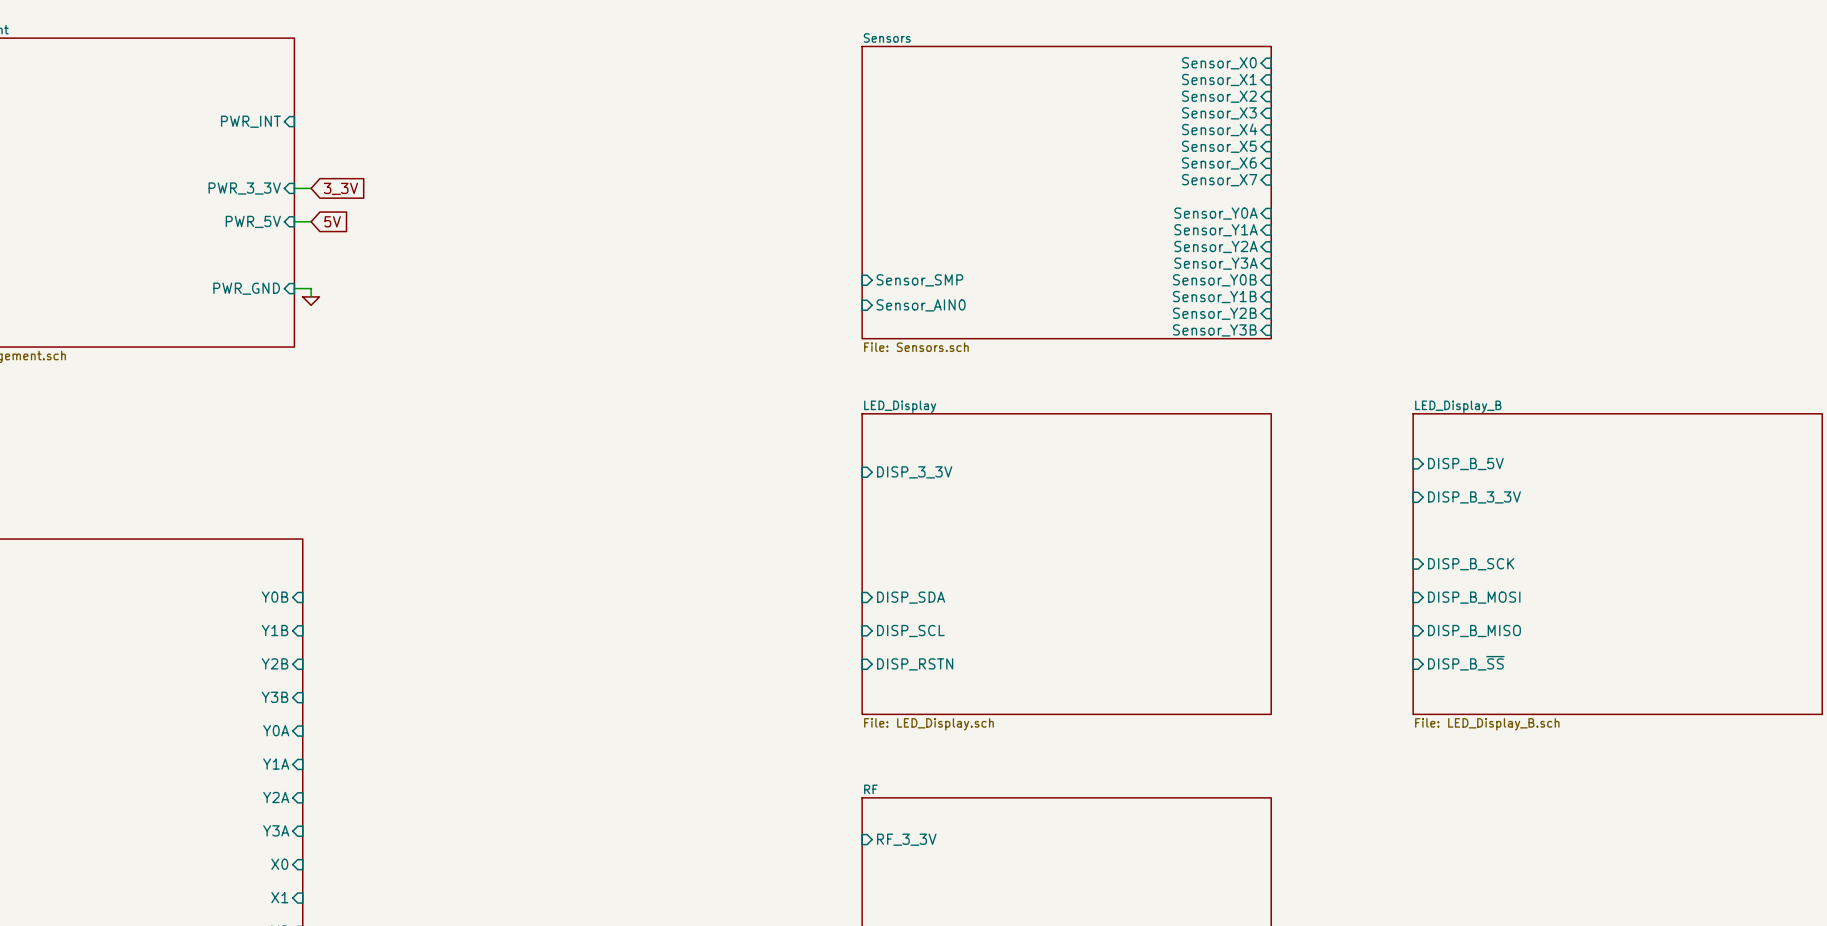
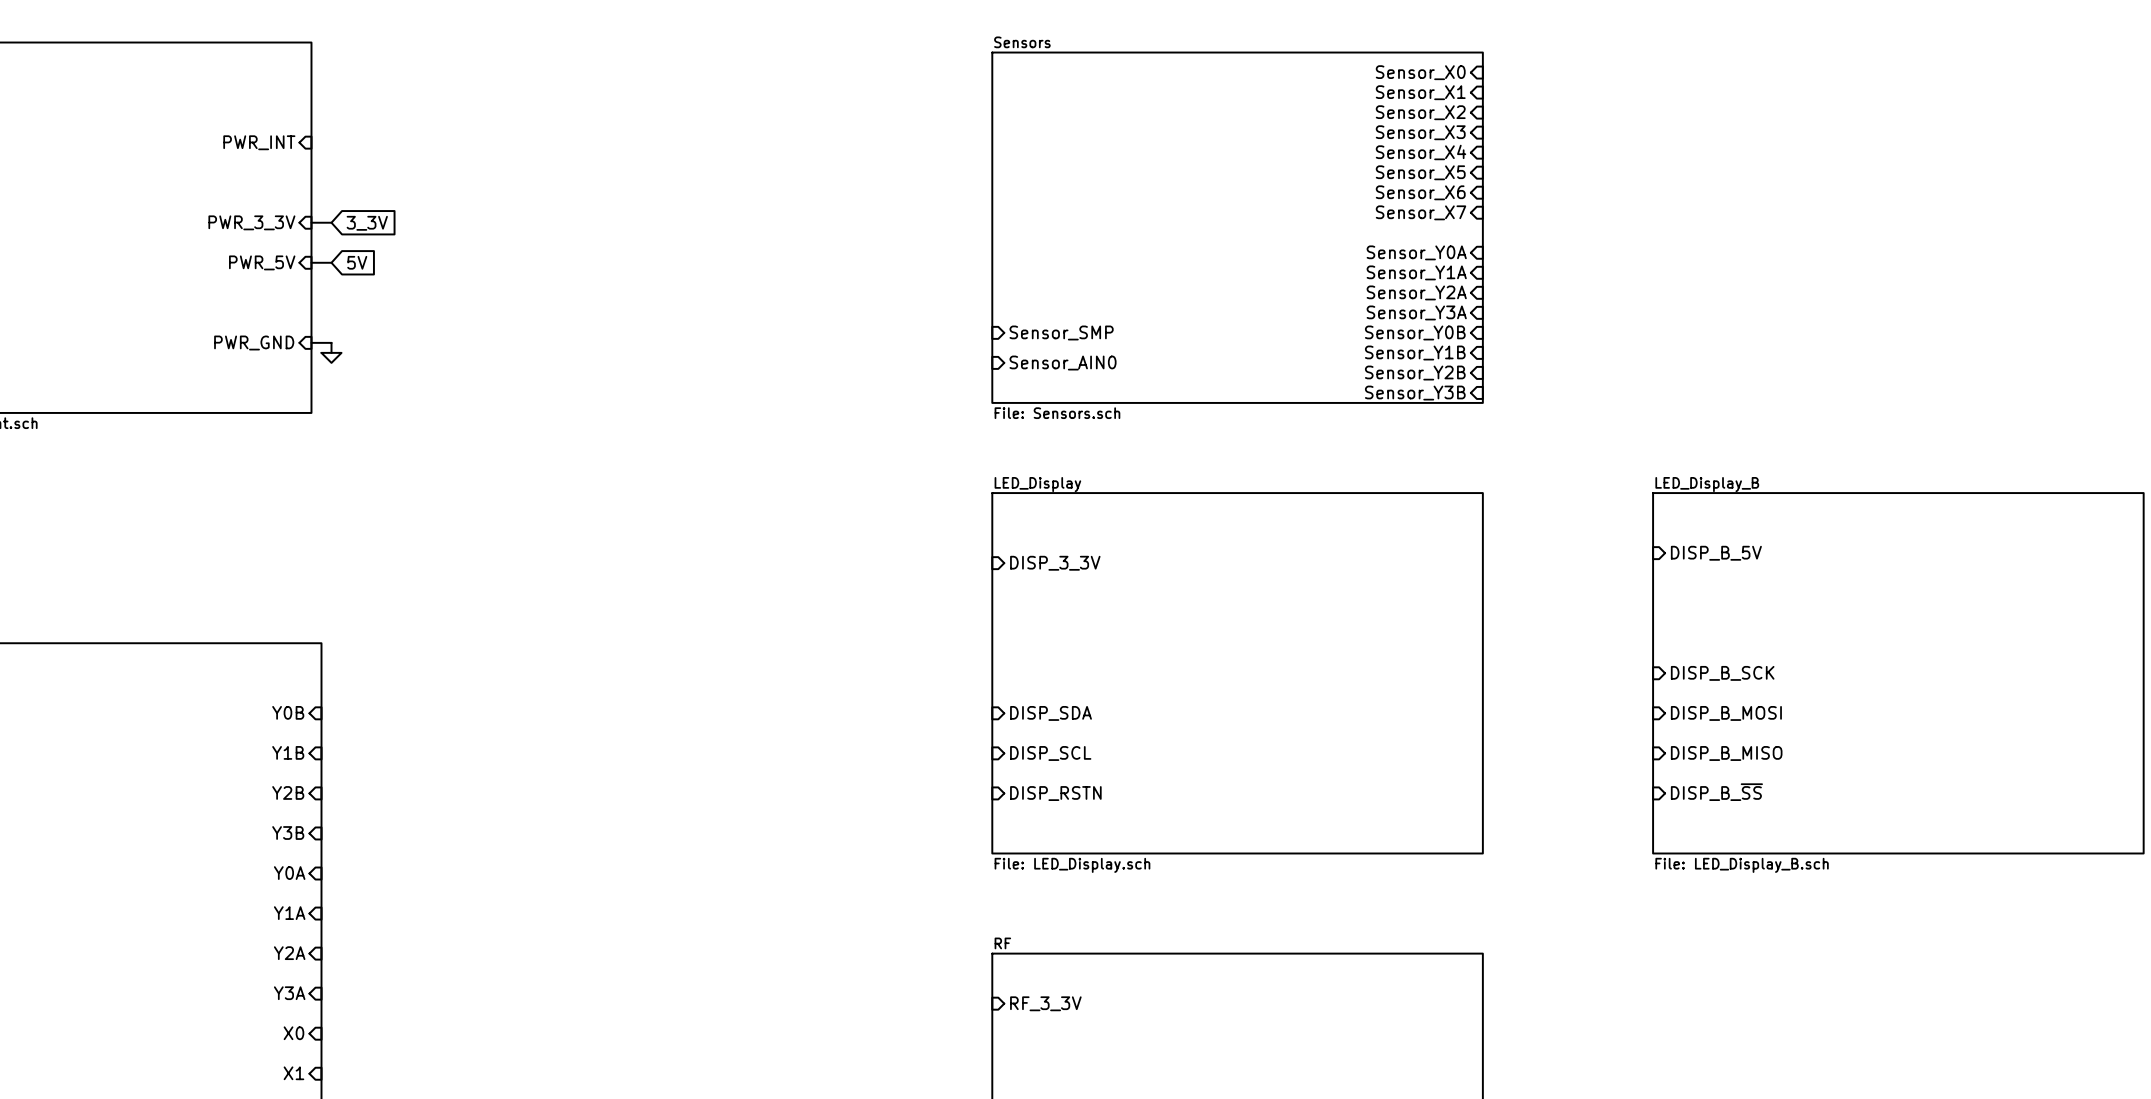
sheet pin: DISP_B_3_3V (1474, 497) -> none

